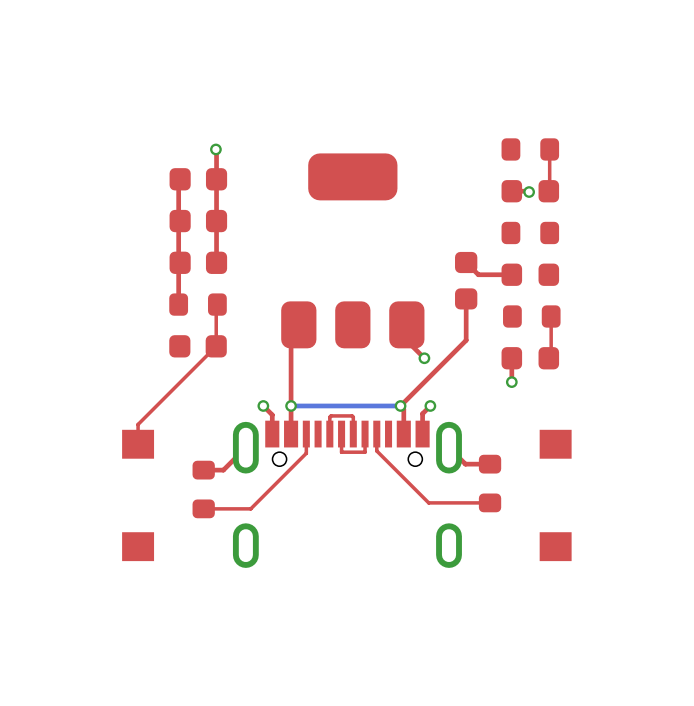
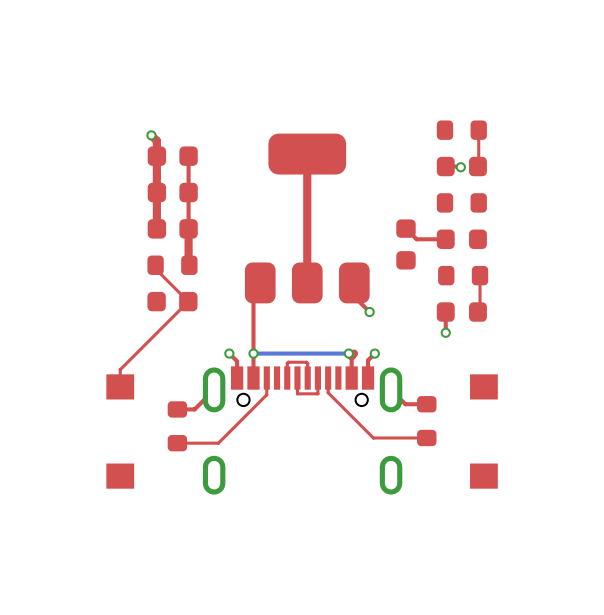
top track: (215, 149) (216, 179) -> none
via position: (215, 149) -> (151, 135)
top track: none -> (151, 135) (156, 140) (156, 228)
top track: none -> (307, 154) (307, 282)
top track: (178, 180) (178, 304) -> none
top track: none -> (188, 228) (189, 265)
top track: (466, 298) (466, 340) (400, 405) (403, 409) -> (354, 353) (351, 356)
top track: (216, 305) (216, 346) -> (155, 265) (155, 268) (188, 301)

